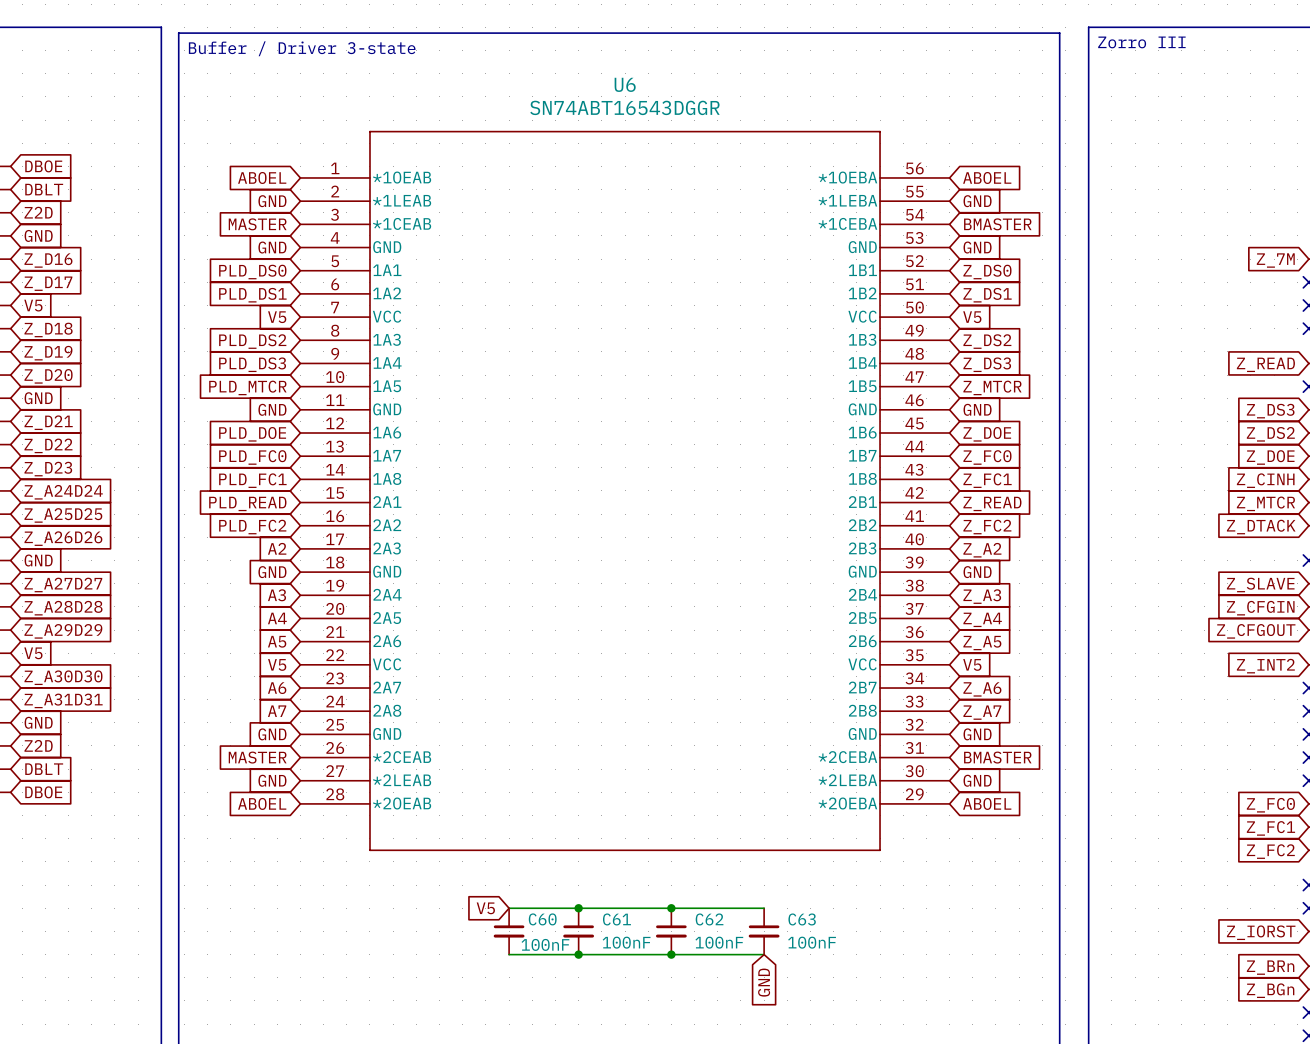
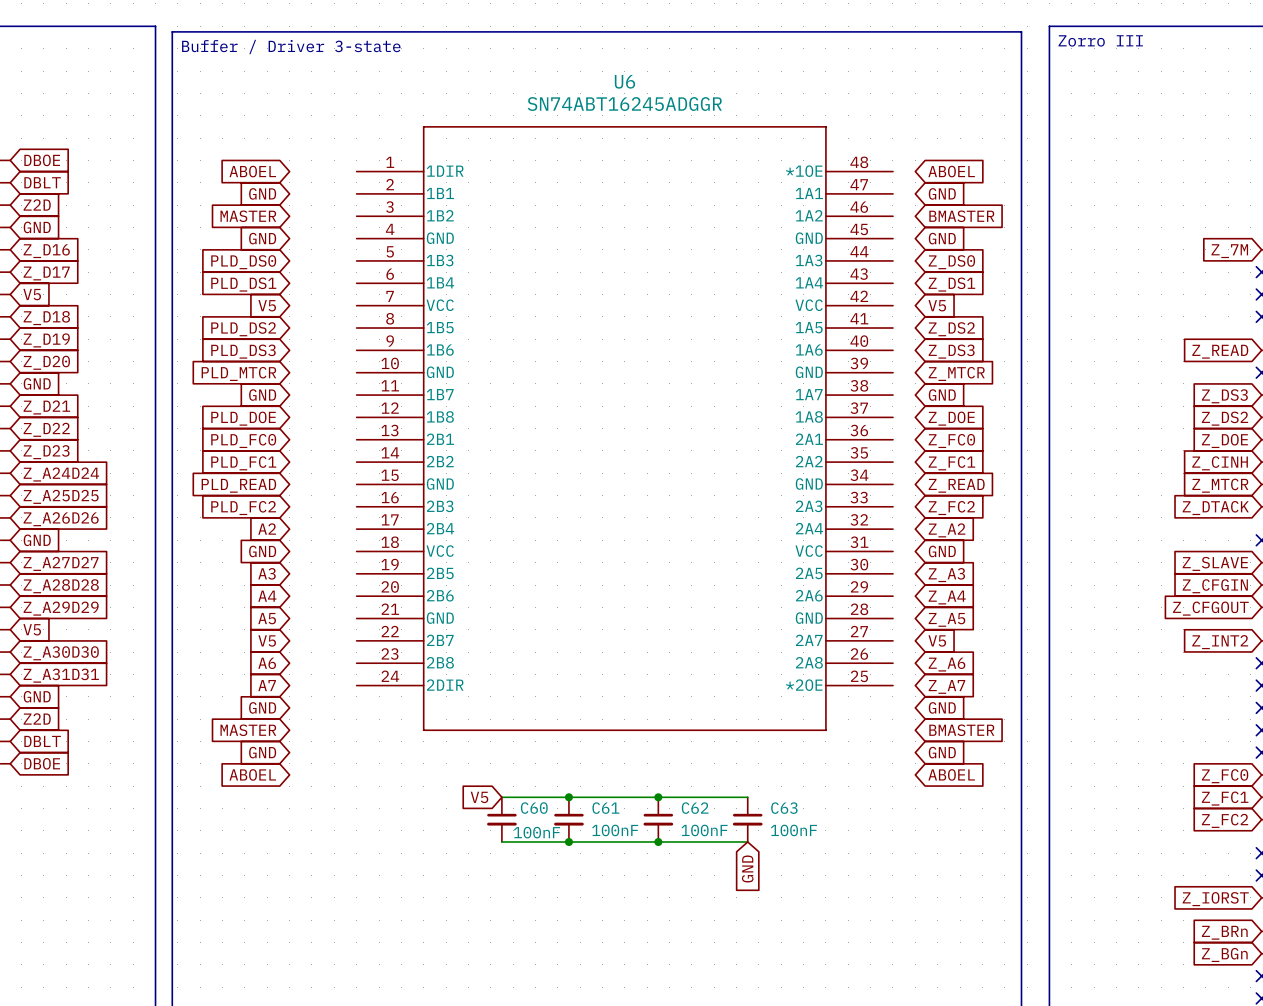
U6 name position: U6 (625, 84) -> U6 (624, 81)
U6 value: SN74ABT16543DGGR (624, 107) -> SN74ABT16245ADGGR (624, 104)
U6 symbol: [300, 131, 950, 851] -> [356, 126, 893, 731]
junction: none -> (568, 797)
junction: none -> (658, 797)
global label position: V5 (485, 908) -> V5 (479, 797)
wire: (509, 908) (764, 908) -> (501, 797) (747, 797)
junction position: (578, 908) -> (568, 841)
junction position: (671, 908) -> (658, 841)
C60 position: (509, 931) -> (501, 819)
C61 position: (578, 931) -> (568, 819)
C62 position: (671, 931) -> (658, 819)
C63 position: (764, 931) -> (747, 819)
wire: (509, 954) (764, 954) -> (501, 841) (747, 841)
junction: (578, 954) -> none
junction: (671, 954) -> none
global label position: GND (764, 982) -> GND (747, 868)

